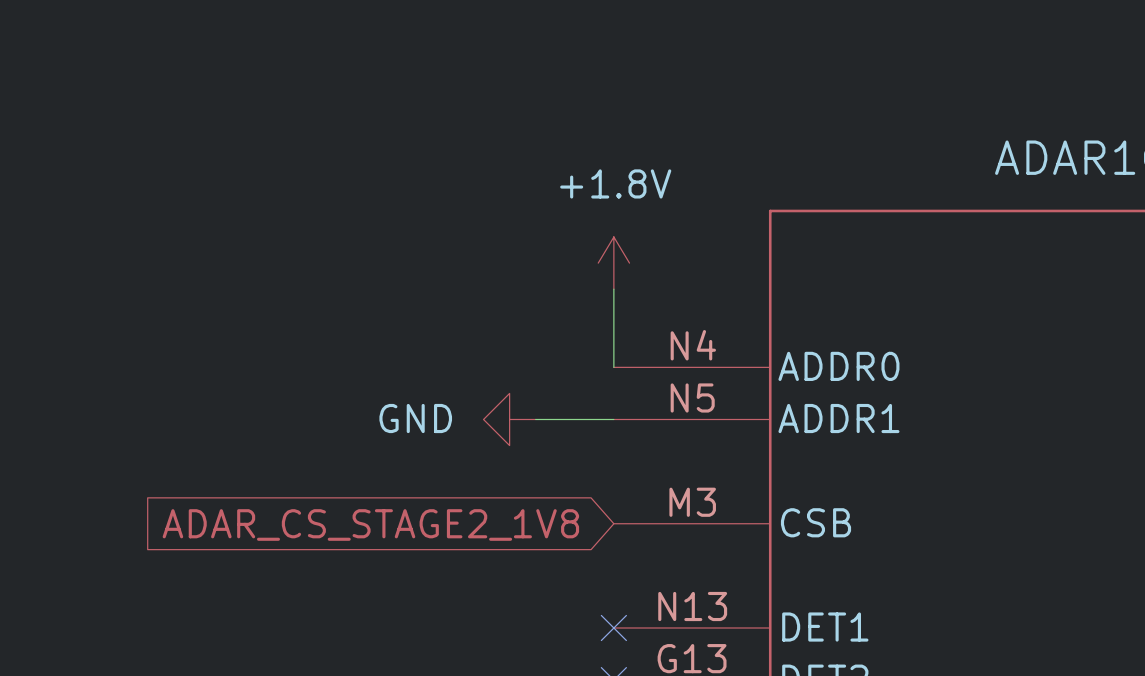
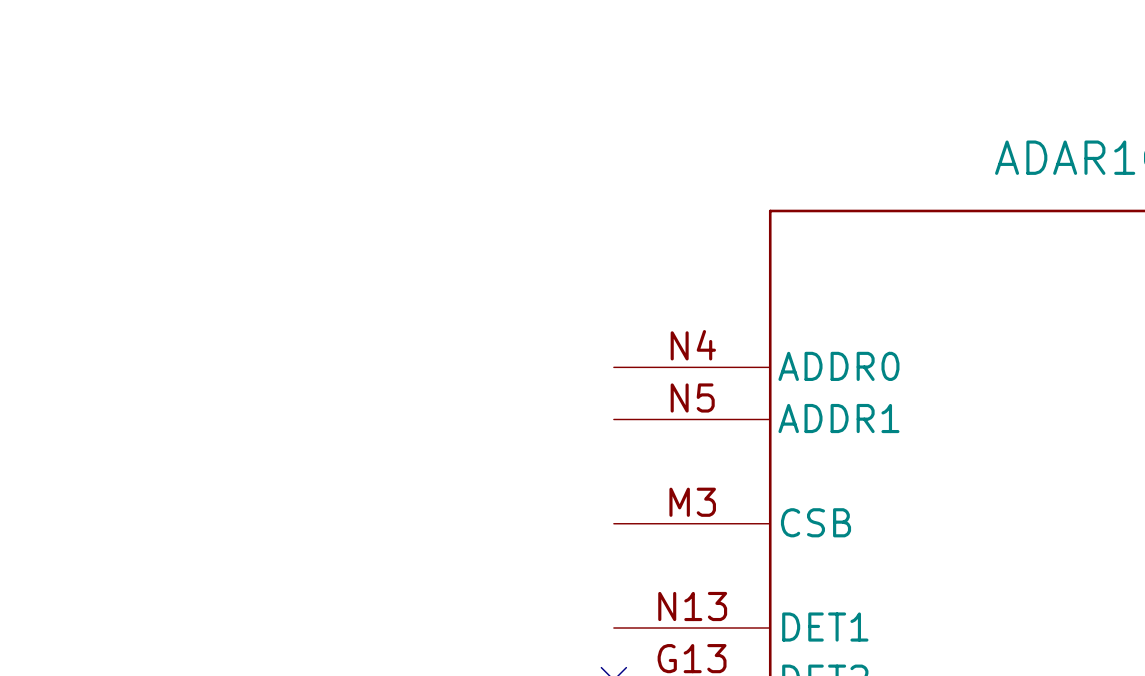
power symbol: +1.8V (613, 263) -> none
wire: (613, 289) (613, 367) -> none
power symbol: GND (509, 419) -> none
wire: (535, 419) (613, 419) -> none
global label: ADAR_CS_STAGE2_1V8 (370, 524) -> none
no-connect mark: (613, 628) -> none

